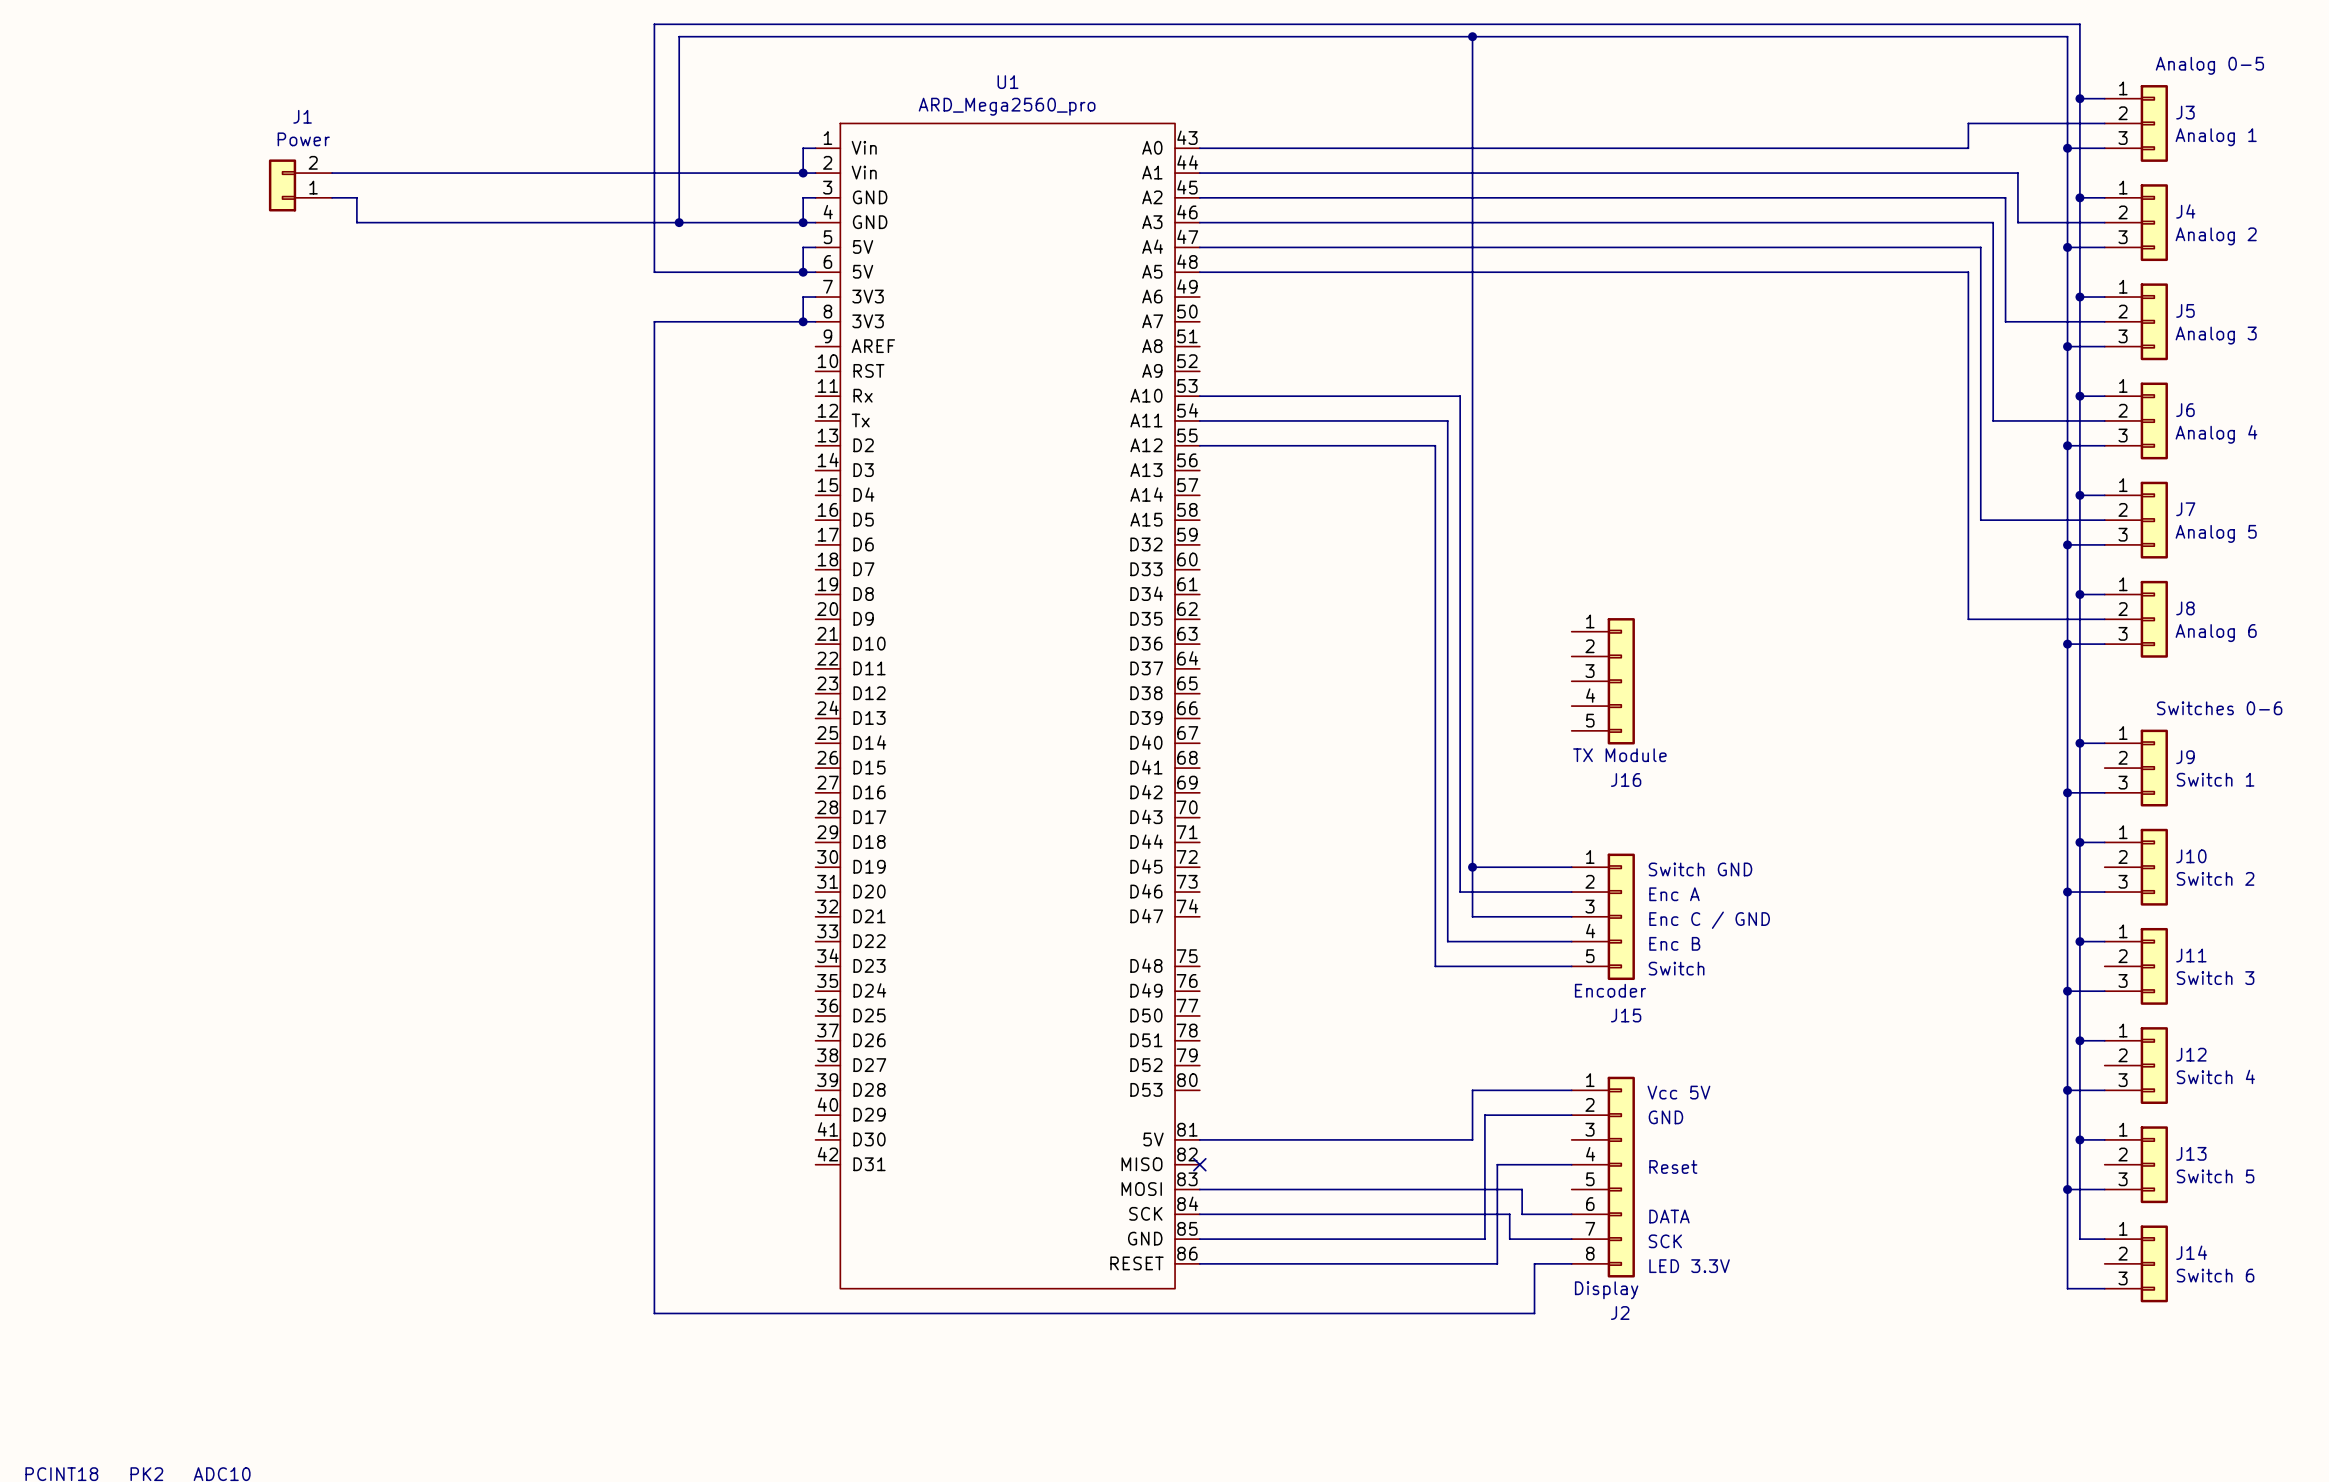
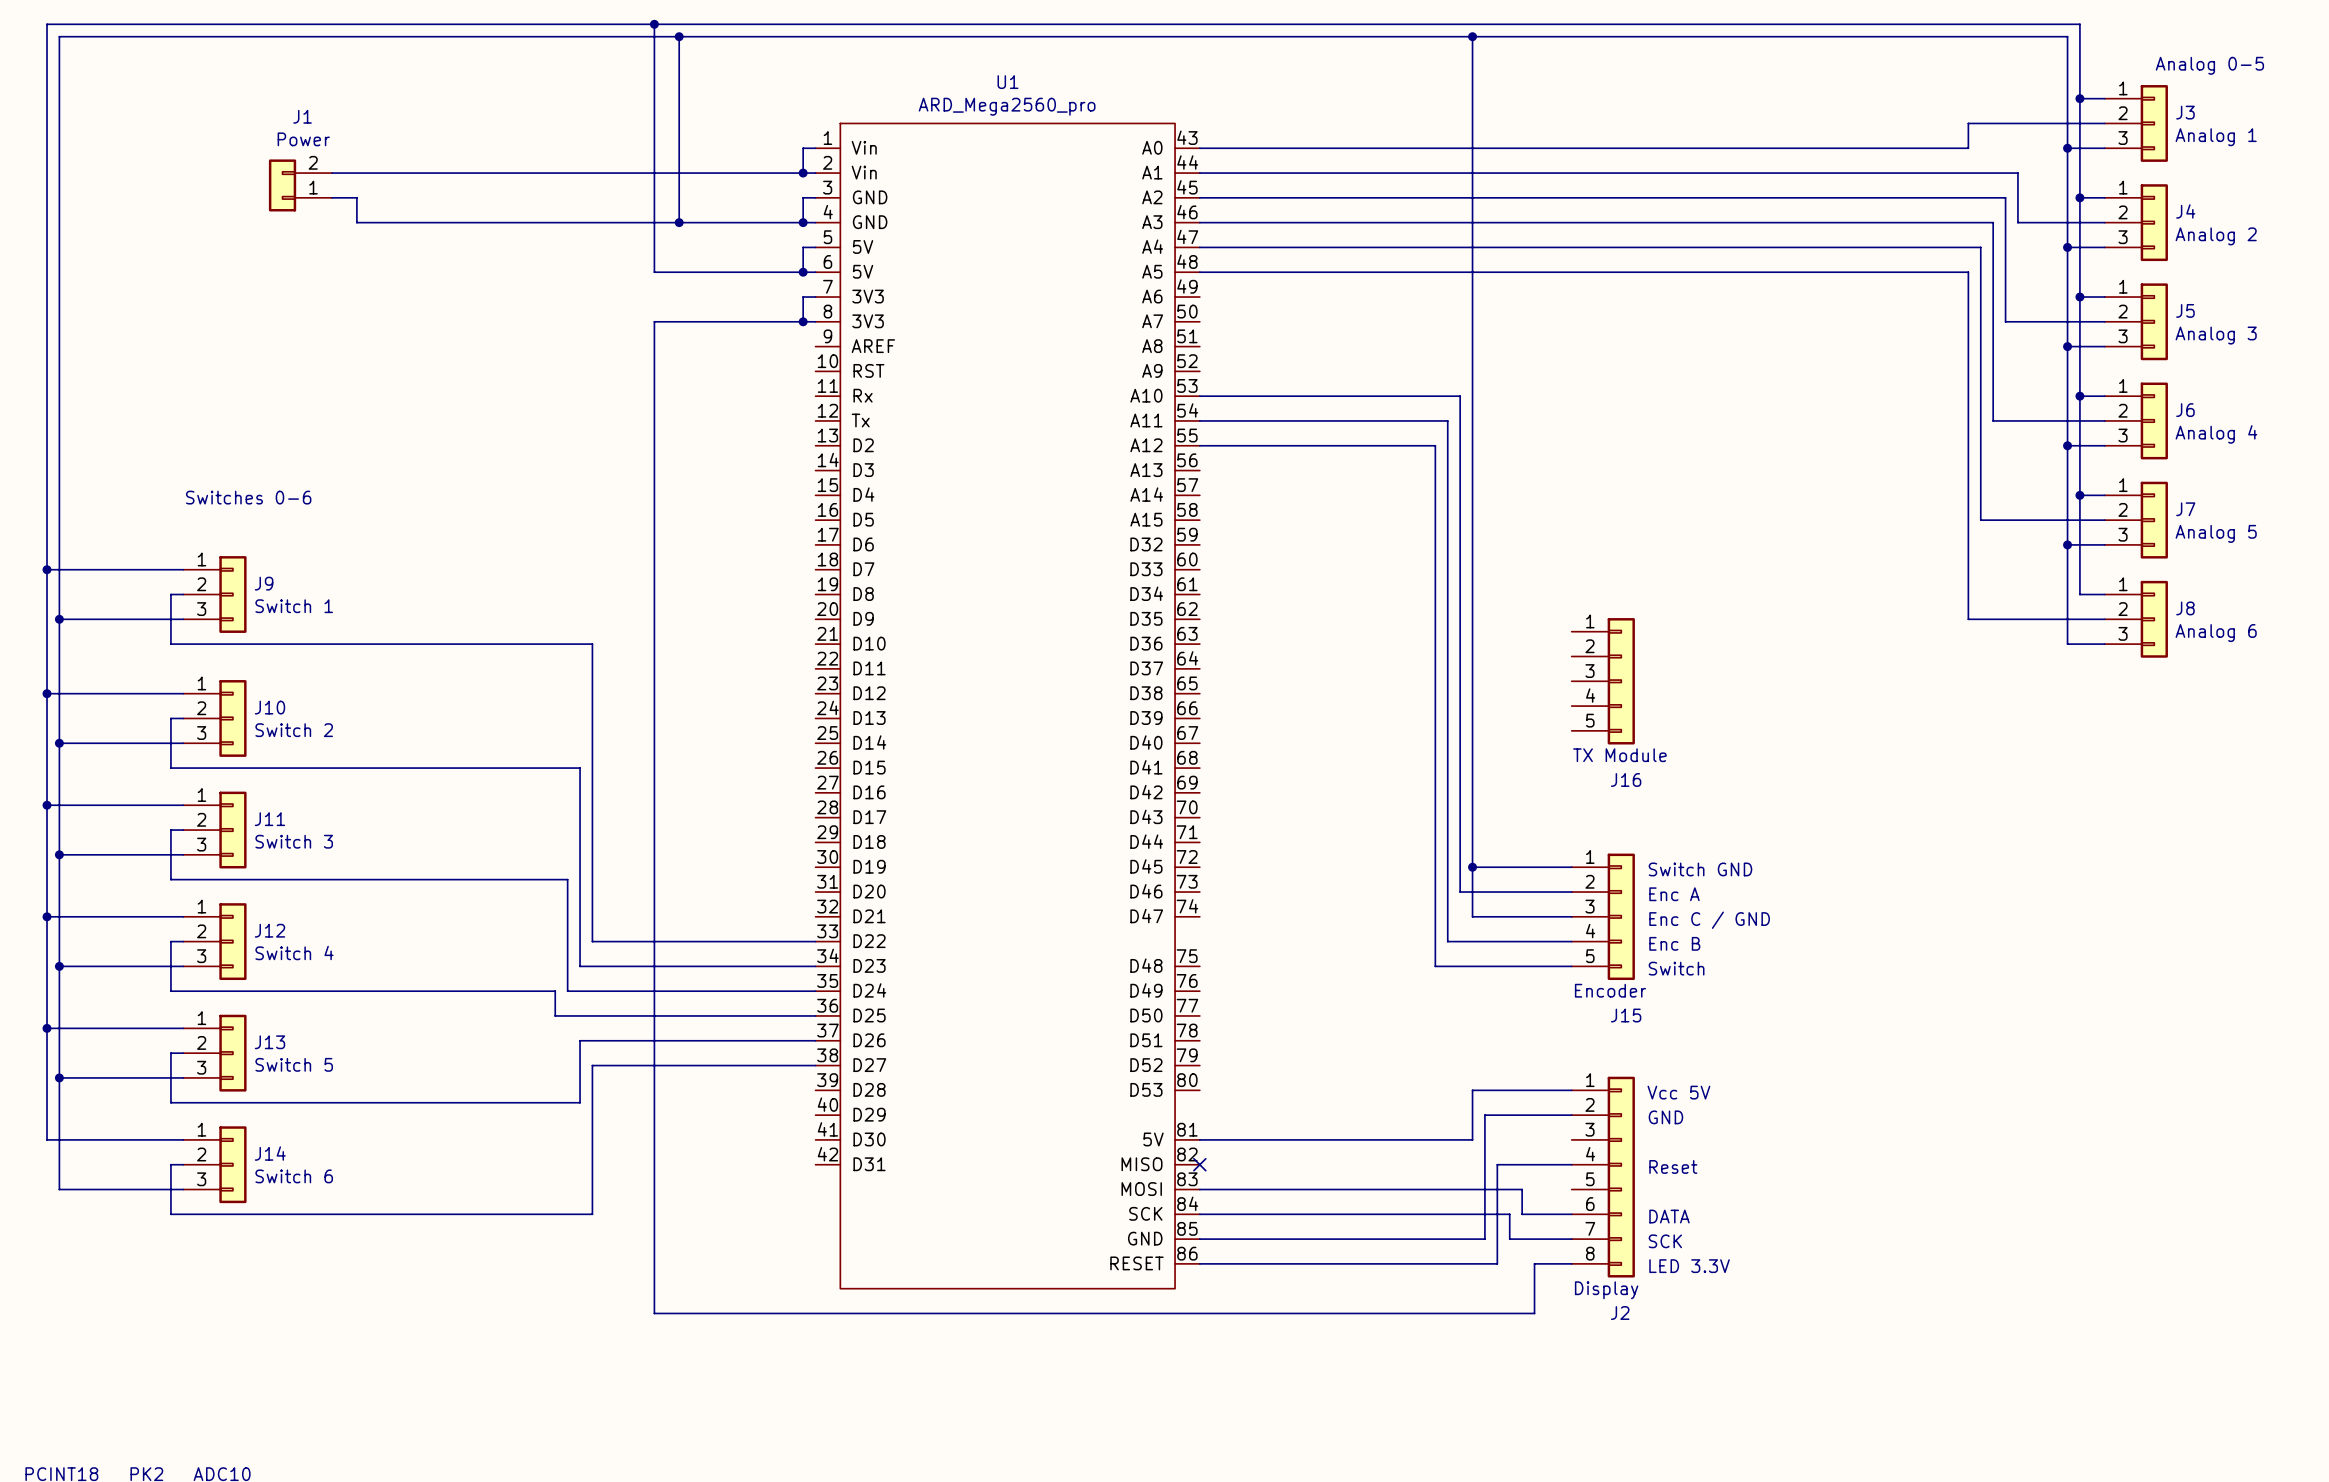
wire: none -> (654, 24) (47, 24) (47, 1139) (183, 1139)
junction: none -> (654, 24)
wire: none -> (679, 36) (59, 36) (59, 1189) (183, 1189)
junction: none -> (679, 36)
text: none -> Switches 0-6 (248, 497)
wire: none -> (47, 569) (183, 569)
junction: none -> (47, 569)
wire: none -> (183, 594) (170, 594) (170, 644) (592, 644) (592, 941) (815, 941)
wire: (2079, 594) (2079, 1239) (2104, 1239) -> none
junction: (2079, 594) -> none
wire: none -> (59, 619) (183, 619)
junction: none -> (59, 619)
wire: (2067, 644) (2067, 1288) (2104, 1288) -> none
junction: (2067, 644) -> none
wire: none -> (47, 693) (183, 693)
junction: none -> (47, 693)
text: Switches 0-6 (2219, 708) -> none
wire: none -> (183, 718) (170, 718) (170, 768) (580, 768) (580, 966) (815, 966)
wire: none -> (59, 743) (183, 743)
junction: none -> (59, 743)
wire: (2079, 743) (2104, 743) -> none
junction: (2079, 743) -> none
J9 position: (2136, 768) -> (214, 594)
wire: (2067, 792) (2104, 792) -> none
junction: (2067, 792) -> none
wire: none -> (47, 805) (183, 805)
junction: none -> (47, 805)
wire: none -> (183, 830) (170, 830) (170, 879) (567, 879) (567, 991) (815, 991)
wire: (2079, 842) (2104, 842) -> none
junction: (2079, 842) -> none
wire: none -> (59, 854) (183, 854)
junction: none -> (59, 854)
J10 position: (2136, 867) -> (214, 718)
wire: (2067, 892) (2104, 892) -> none
junction: (2067, 892) -> none
wire: none -> (47, 916) (183, 916)
junction: none -> (47, 916)
wire: none -> (183, 941) (170, 941) (170, 991) (555, 991) (555, 1015) (815, 1015)
wire: (2079, 941) (2104, 941) -> none
junction: (2079, 941) -> none
wire: none -> (59, 966) (183, 966)
junction: none -> (59, 966)
J11 position: (2136, 966) -> (214, 830)
wire: (2067, 991) (2104, 991) -> none
junction: (2067, 991) -> none
wire: none -> (47, 1028) (183, 1028)
junction: none -> (47, 1028)
wire: none -> (815, 1040) (580, 1040) (580, 1102) (170, 1102) (170, 1053) (183, 1053)
wire: (2079, 1040) (2104, 1040) -> none
junction: (2079, 1040) -> none
wire: none -> (815, 1065) (592, 1065) (592, 1214) (170, 1214) (170, 1164) (183, 1164)
J12 position: (2136, 1065) -> (214, 941)
wire: none -> (59, 1077) (183, 1077)
junction: none -> (59, 1077)
wire: (2067, 1090) (2104, 1090) -> none
junction: (2067, 1090) -> none
wire: (2079, 1139) (2104, 1139) -> none
junction: (2079, 1139) -> none
J13 position: (2136, 1164) -> (214, 1053)
wire: (2067, 1189) (2104, 1189) -> none
junction: (2067, 1189) -> none
J14 position: (2136, 1263) -> (214, 1164)

